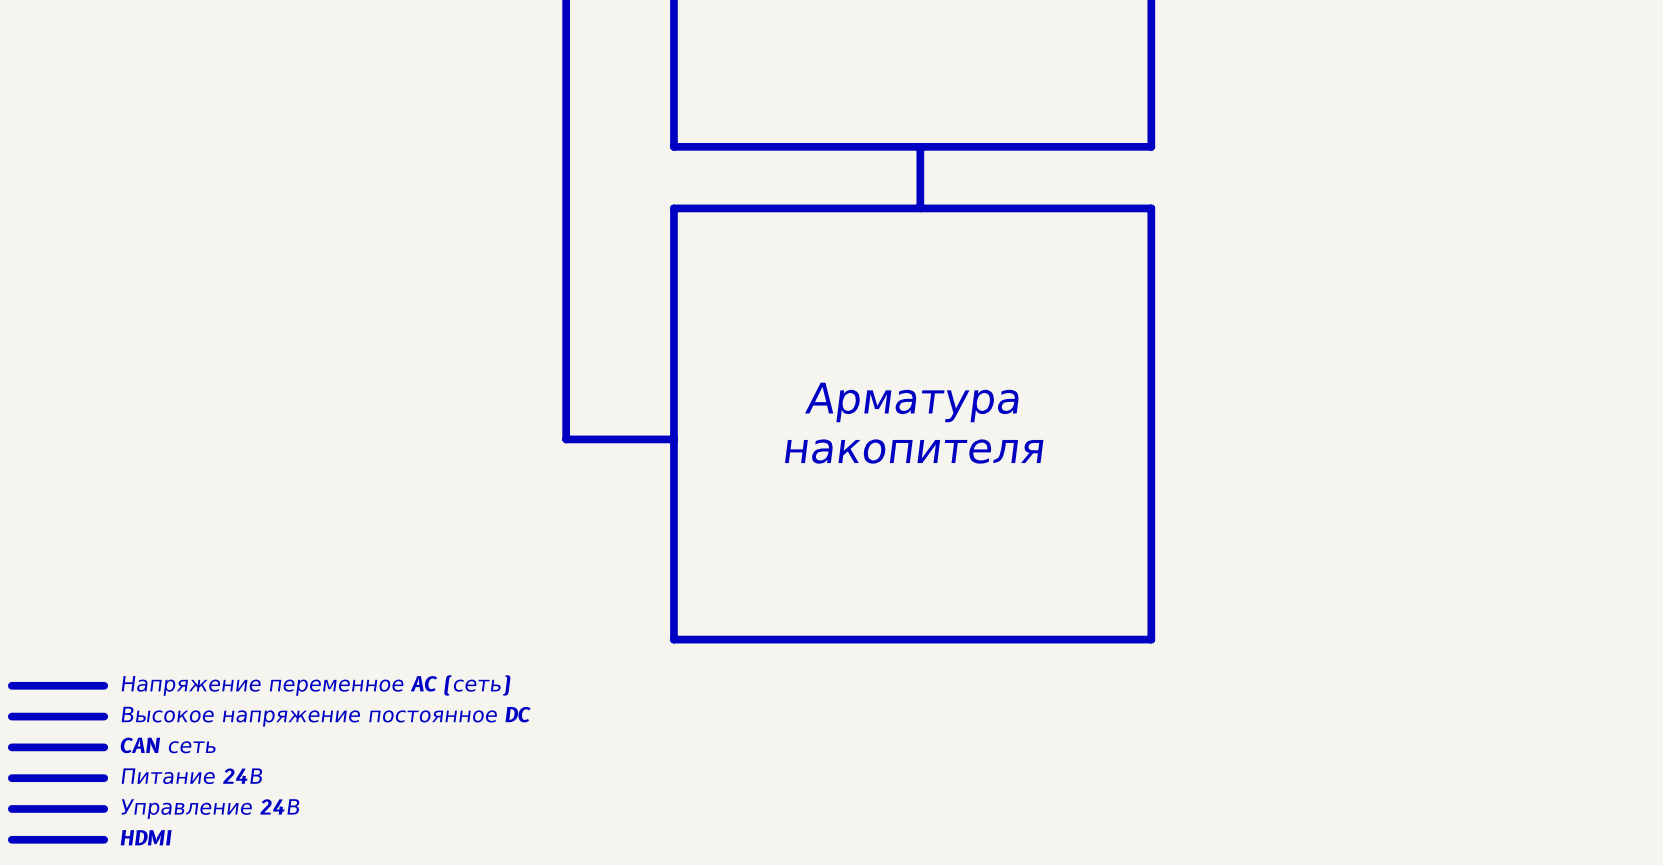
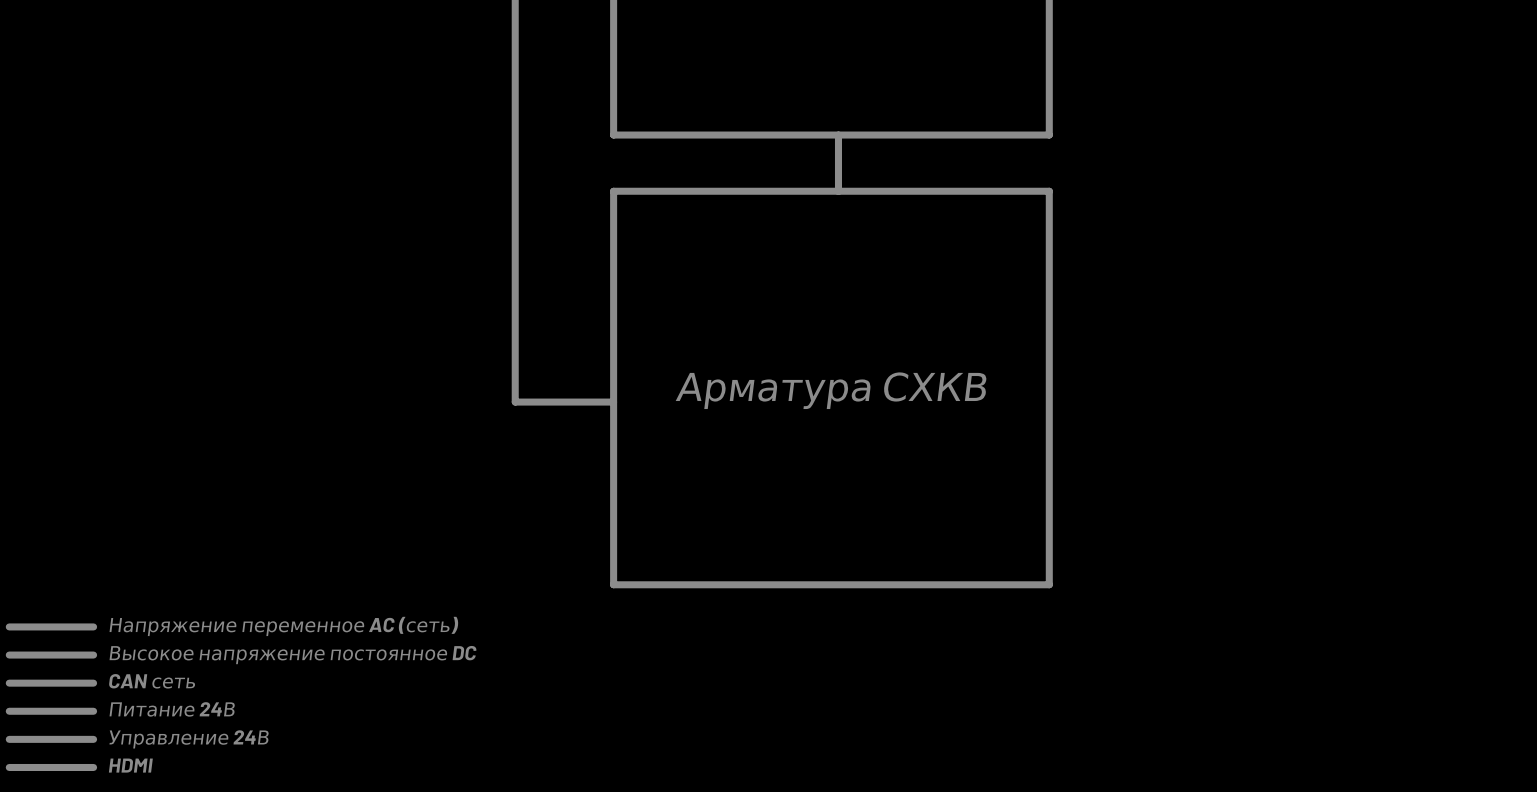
text: Арматура (912, 402) -> Арматура СХКВ (831, 390)
text: накопителя (914, 451) -> none

